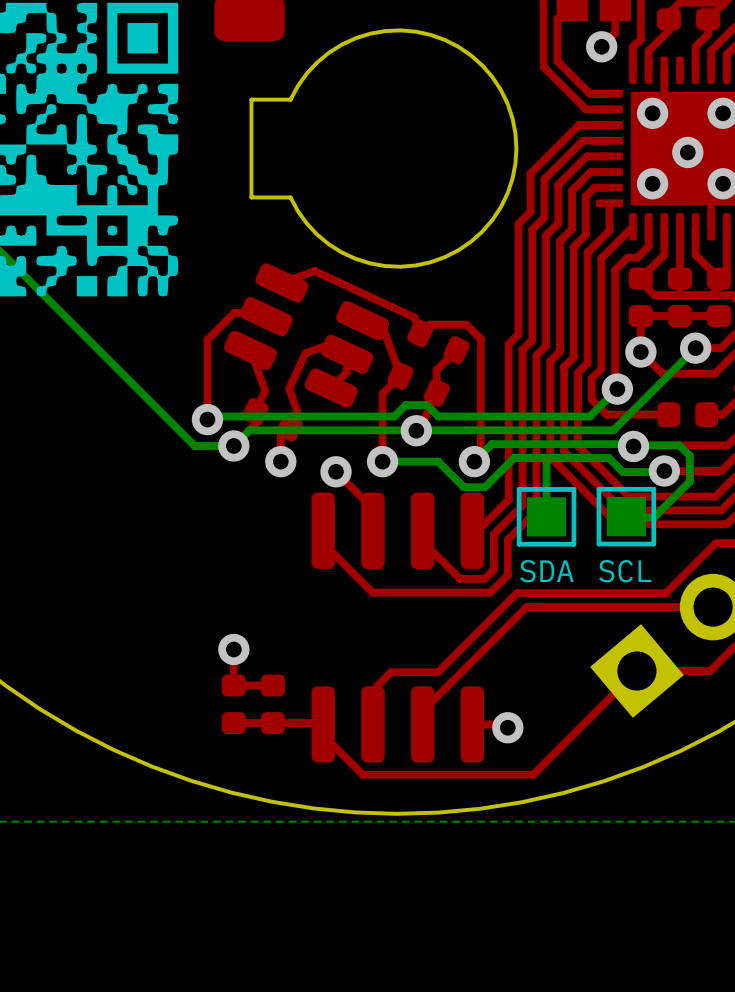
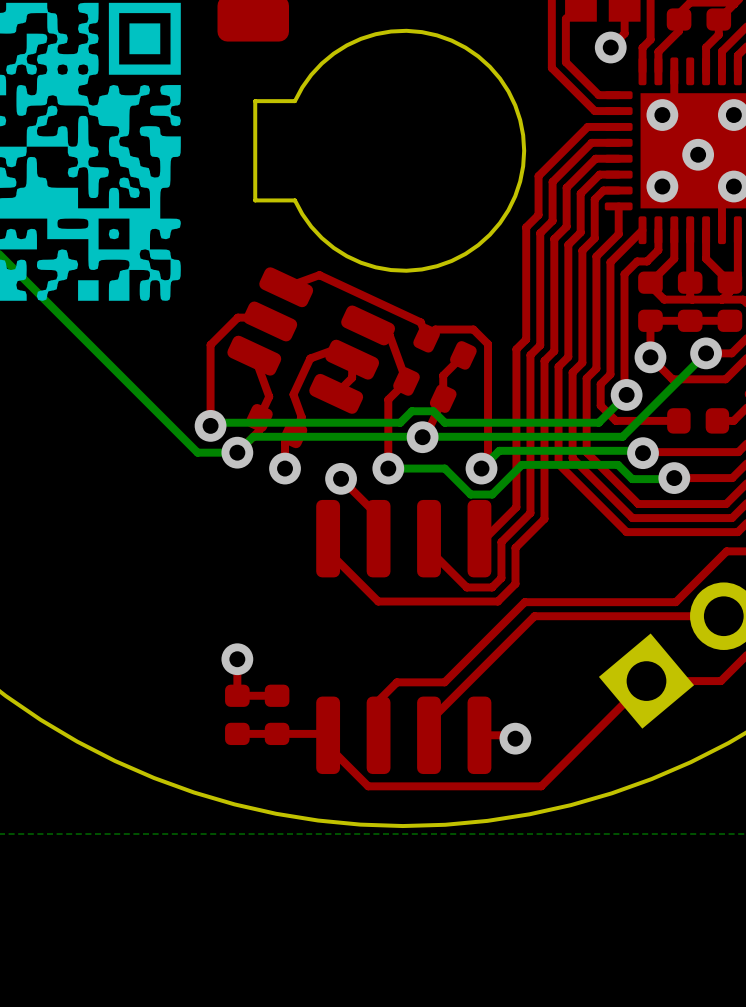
bottom track: (633, 446) (679, 445) (689, 455) (689, 481) (653, 517) (624, 517) -> none
bottom track: (551, 458) (546, 462) (546, 516) -> none
part: (546, 516) -> none
part: (626, 516) -> none
drawing: [520, 560, 652, 583] -> none

